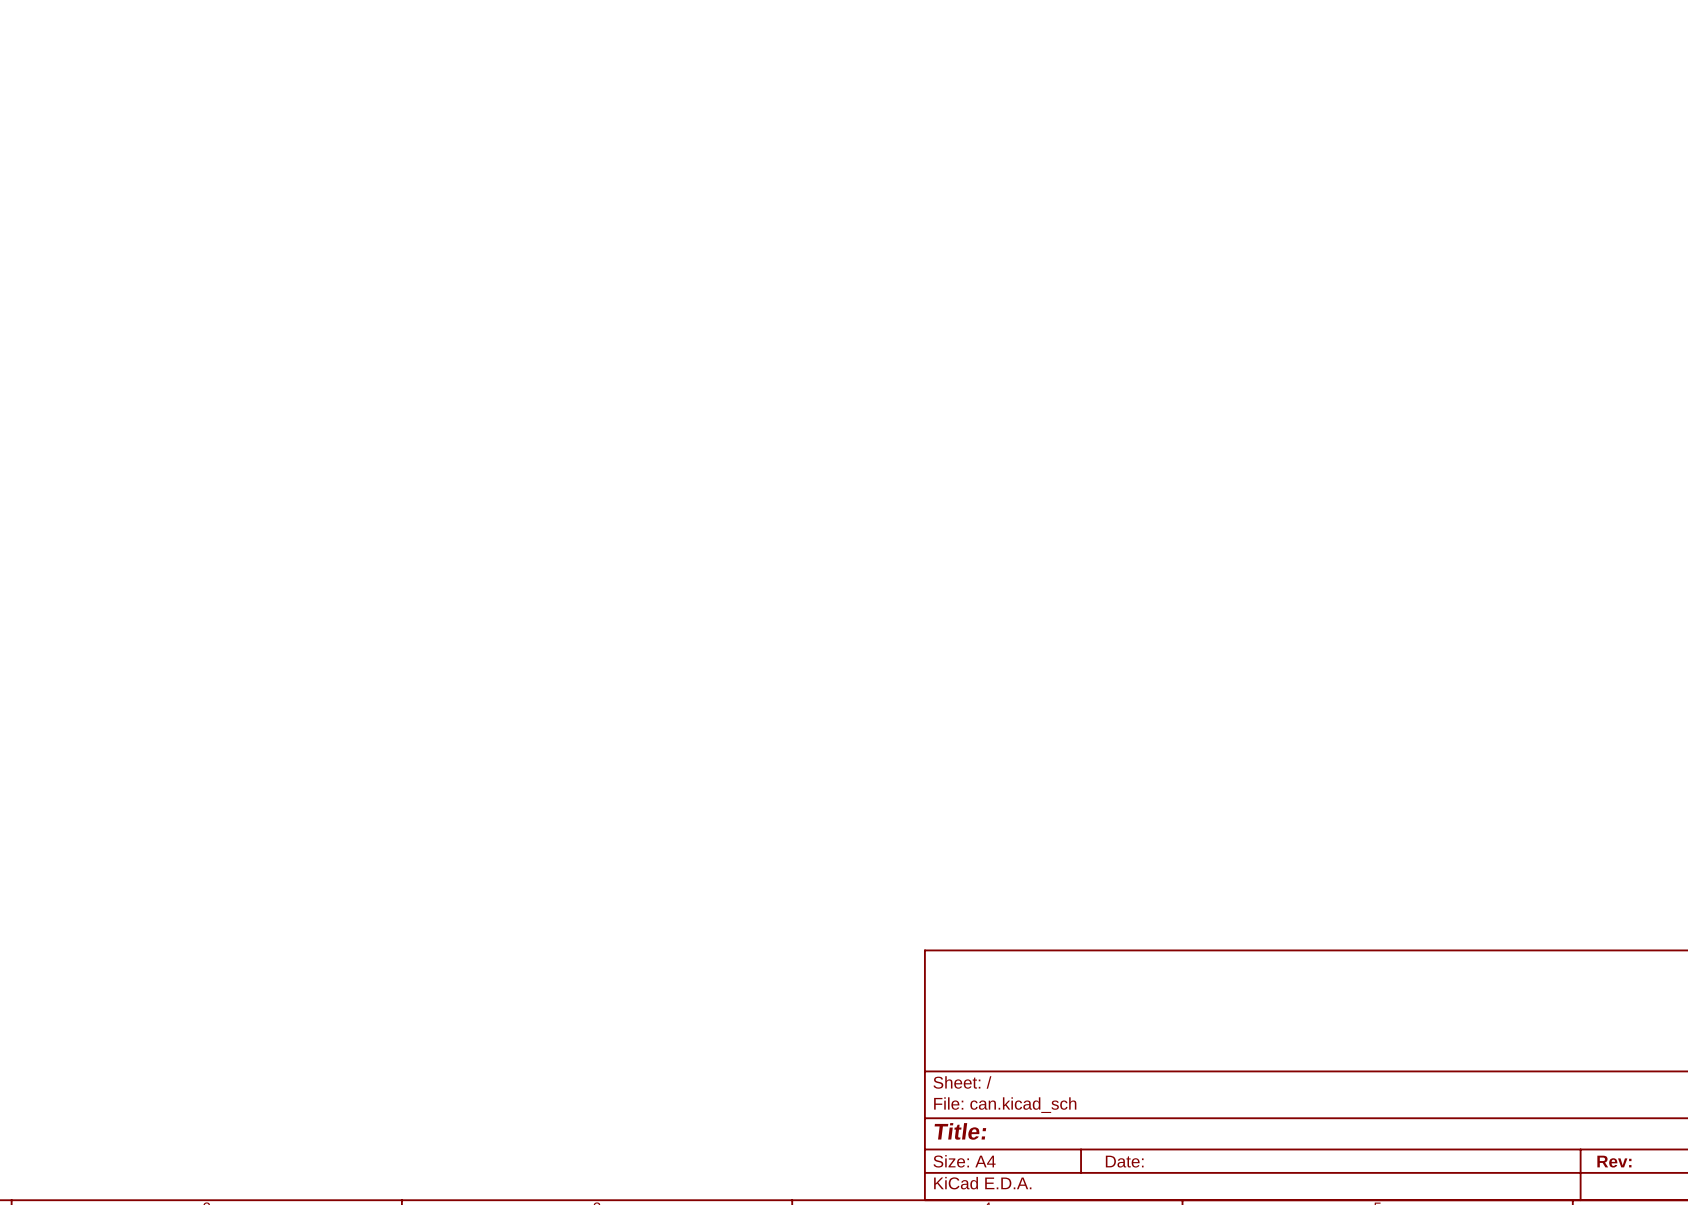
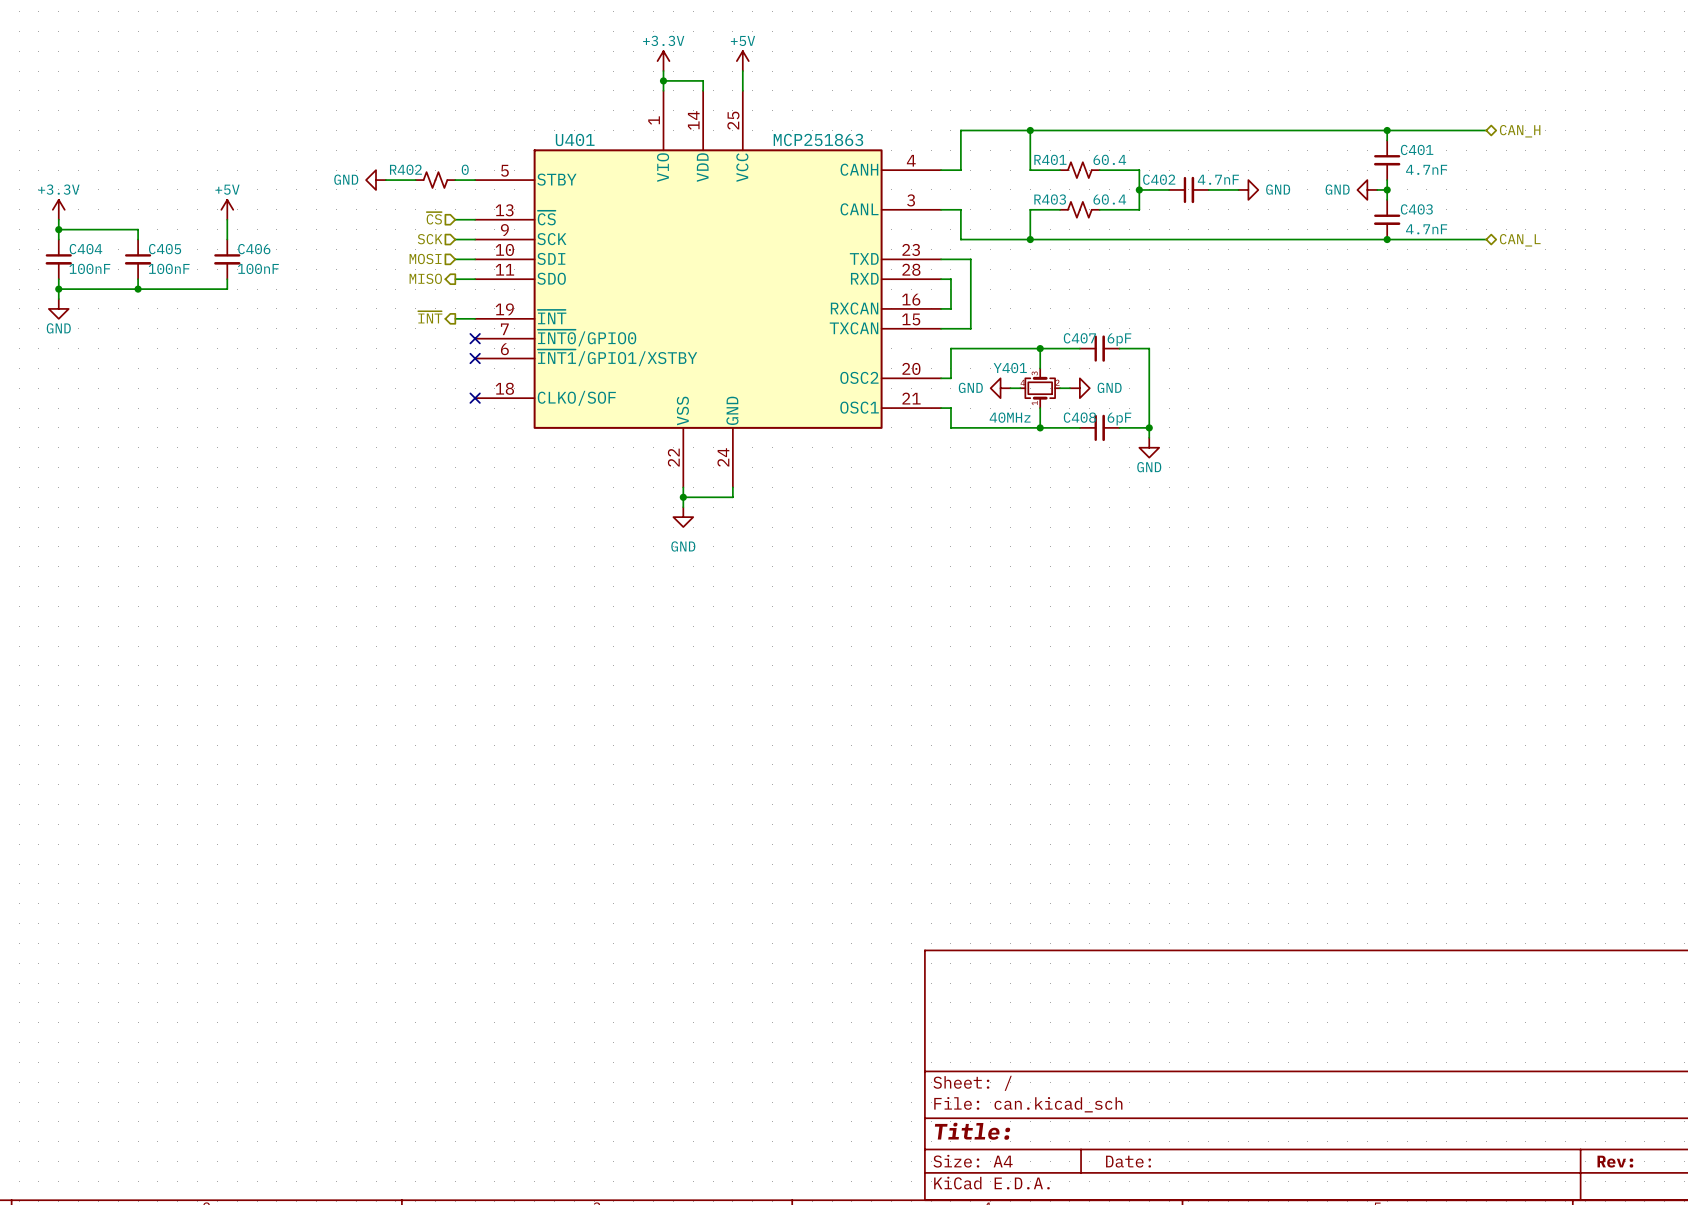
power symbol: none -> +3.3V (663, 61)
power symbol: none -> +5V (742, 61)
wire: none -> (663, 71) (663, 90)
wire: none -> (742, 71) (742, 90)
wire: none -> (663, 80) (703, 80) (703, 90)
junction: none -> (663, 80)
wire: none -> (1030, 130) (1030, 170) (1060, 170)
junction: none -> (1030, 130)
wire: none -> (1387, 130) (1387, 140)
junction: none -> (1387, 130)
wire: none -> (1486, 130) (960, 130) (960, 170) (941, 170)
hierarchical label: none -> CAN_H (1520, 131)
C401: none -> 4.7nF (1387, 160)
R401: none -> 60.4 (1079, 170)
wire: none -> (1099, 170) (1139, 170) (1139, 209) (1099, 209)
power symbol: none -> GND (376, 180)
wire: none -> (385, 180) (415, 180)
R402: none -> 0 (435, 180)
wire: none -> (455, 180) (475, 180)
wire: none -> (1387, 180) (1387, 199)
wire: none -> (1139, 189) (1169, 189)
junction: none -> (1139, 189)
C402: none -> 4.7nF (1188, 189)
wire: none -> (1208, 189) (1238, 189)
power symbol: none -> GND (1248, 189)
power symbol: none -> GND (1367, 189)
wire: none -> (1377, 189) (1387, 189)
junction: none -> (1387, 189)
power symbol: none -> +3.3V (58, 209)
power symbol: none -> +5V (227, 209)
wire: none -> (941, 209) (960, 209) (960, 239) (1486, 239)
wire: none -> (1060, 209) (1030, 209) (1030, 239)
R403: none -> 60.4 (1079, 209)
hierarchical label: none -> ~{CS} (434, 218)
wire: none -> (58, 219) (58, 239)
wire: none -> (227, 219) (227, 239)
wire: none -> (455, 219) (475, 219)
C403: none -> 4.7nF (1387, 219)
wire: none -> (58, 229) (138, 229) (138, 239)
junction: none -> (58, 229)
hierarchical label: none -> SCK (430, 239)
wire: none -> (455, 239) (475, 239)
junction: none -> (1030, 239)
junction: none -> (1387, 239)
hierarchical label: none -> CAN_L (1520, 240)
hierarchical label: none -> MOSI (425, 259)
C404: none -> 100nF (58, 259)
C405: none -> 100nF (138, 259)
C406: none -> 100nF (227, 259)
wire: none -> (455, 259) (475, 259)
wire: none -> (941, 259) (970, 259) (970, 328) (941, 328)
hierarchical label: none -> MISO (425, 278)
wire: none -> (58, 279) (58, 299)
wire: none -> (138, 279) (138, 289)
wire: none -> (227, 279) (227, 289) (58, 289)
wire: none -> (455, 279) (475, 279)
wire: none -> (941, 279) (950, 279) (950, 308) (941, 308)
junction: none -> (58, 289)
junction: none -> (138, 289)
U401: none -> MCP251863 (708, 289)
power symbol: none -> GND (58, 308)
hierarchical label: none -> ~{INT} (430, 317)
wire: none -> (455, 318) (475, 318)
no-connect mark: none -> (475, 338)
wire: none -> (1040, 348) (1040, 368)
junction: none -> (1040, 348)
wire: none -> (1079, 348) (950, 348) (950, 378) (941, 378)
C407: none -> 6pF (1099, 348)
wire: none -> (1119, 348) (1149, 348) (1149, 437)
no-connect mark: none -> (475, 358)
power symbol: none -> GND (1000, 388)
wire: none -> (1010, 388) (1020, 388)
Y401: none -> 40MHz (1040, 388)
wire: none -> (1060, 388) (1069, 388)
power symbol: none -> GND (1079, 388)
no-connect mark: none -> (475, 398)
wire: none -> (941, 408) (950, 408) (950, 427) (1079, 427)
wire: none -> (1040, 408) (1040, 427)
junction: none -> (1040, 427)
C408: none -> 6pF (1099, 427)
wire: none -> (1119, 427) (1149, 427)
junction: none -> (1149, 427)
power symbol: none -> GND (1149, 447)
wire: none -> (683, 487) (683, 507)
wire: none -> (732, 487) (732, 497) (683, 497)
junction: none -> (683, 497)
power symbol: none -> GND (683, 517)

